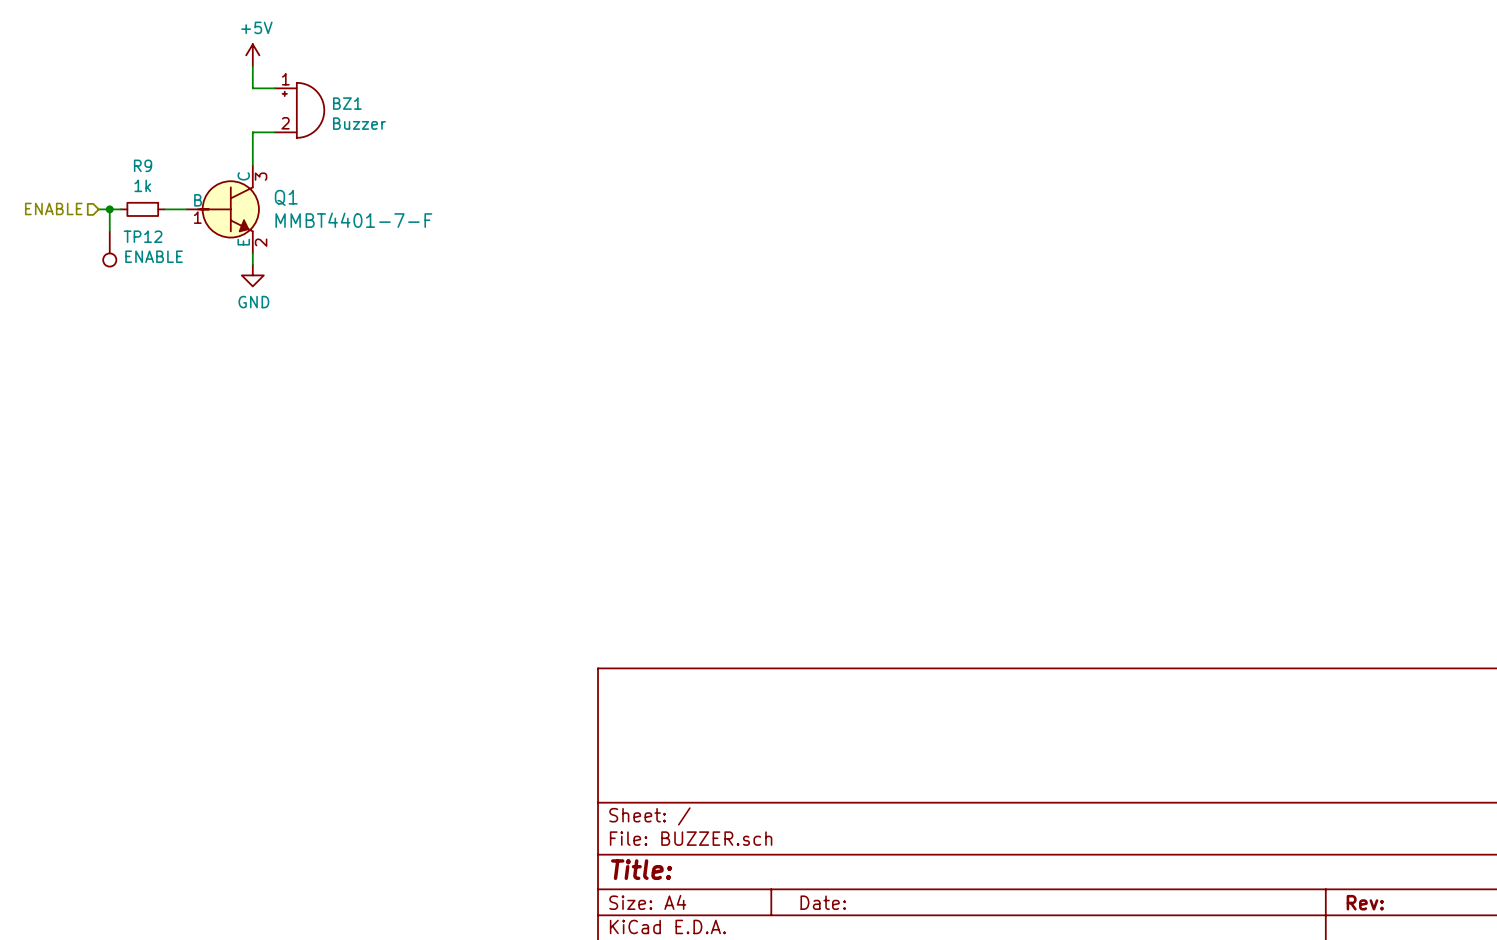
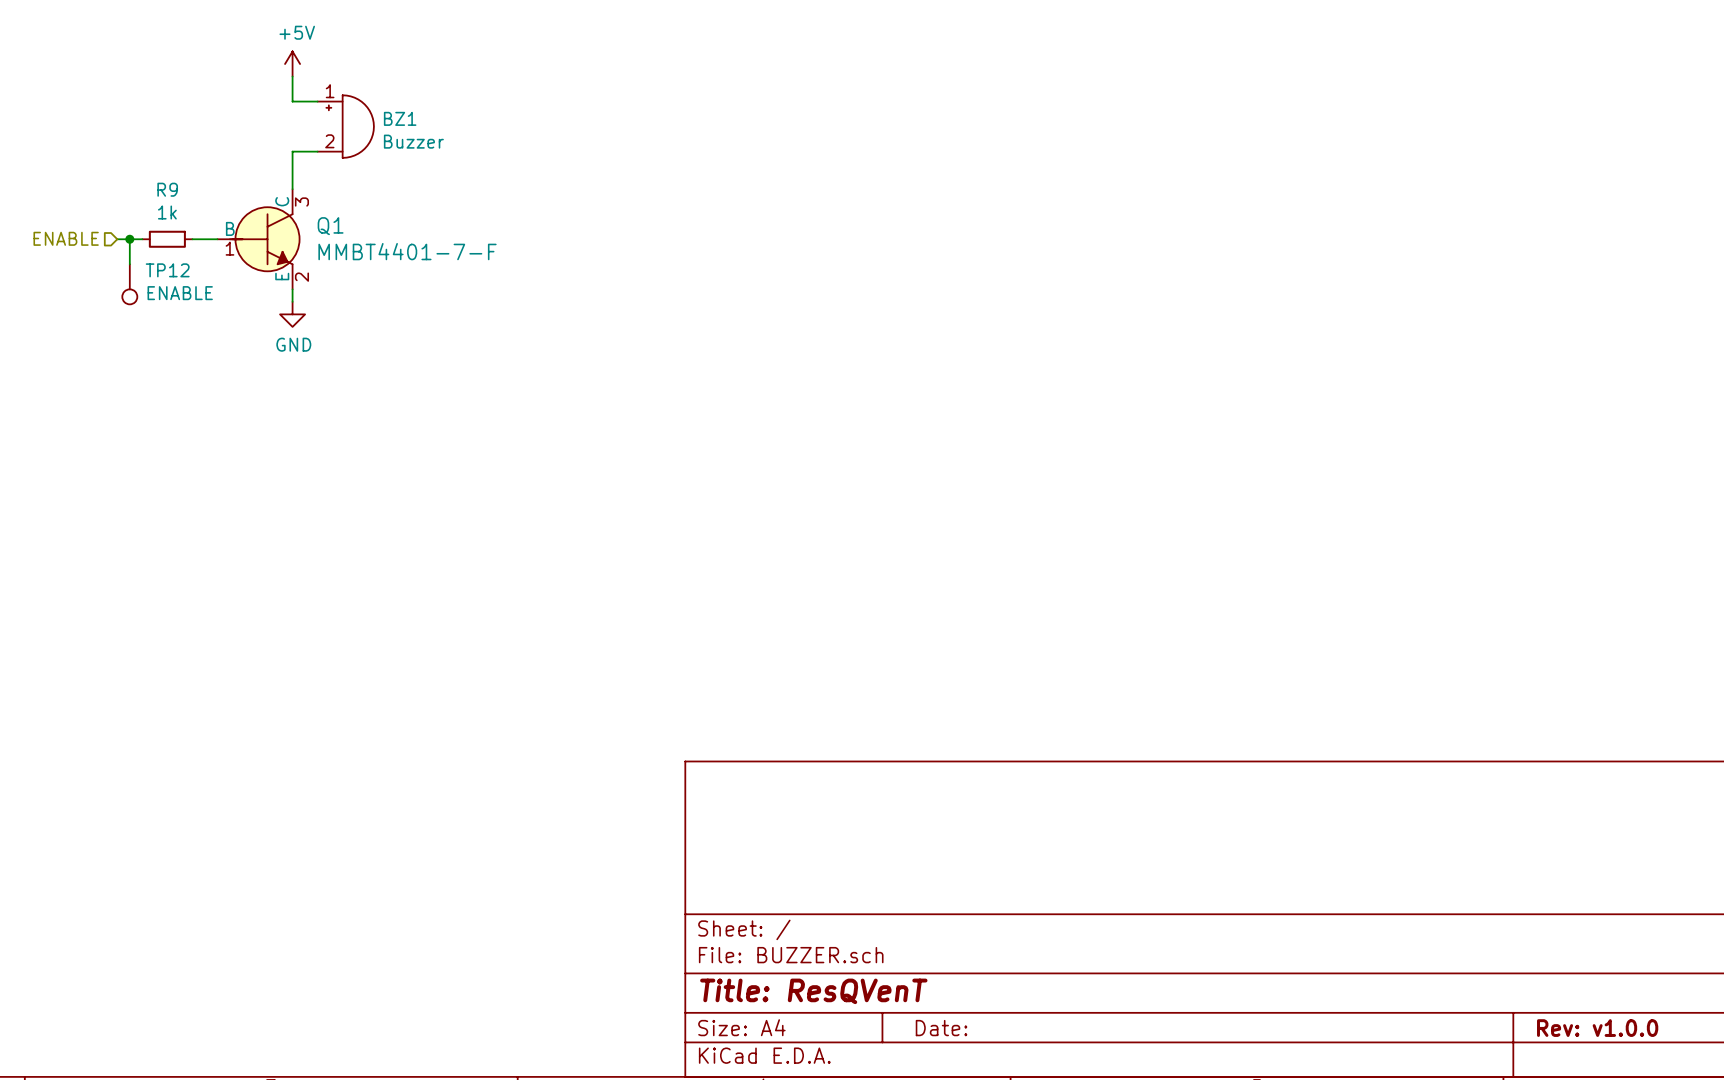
title block: Title: (641, 869) -> Title: ResQVenT (813, 991)
title block: Rev: (1365, 902) -> Rev: v1.0.0 (1597, 1028)

